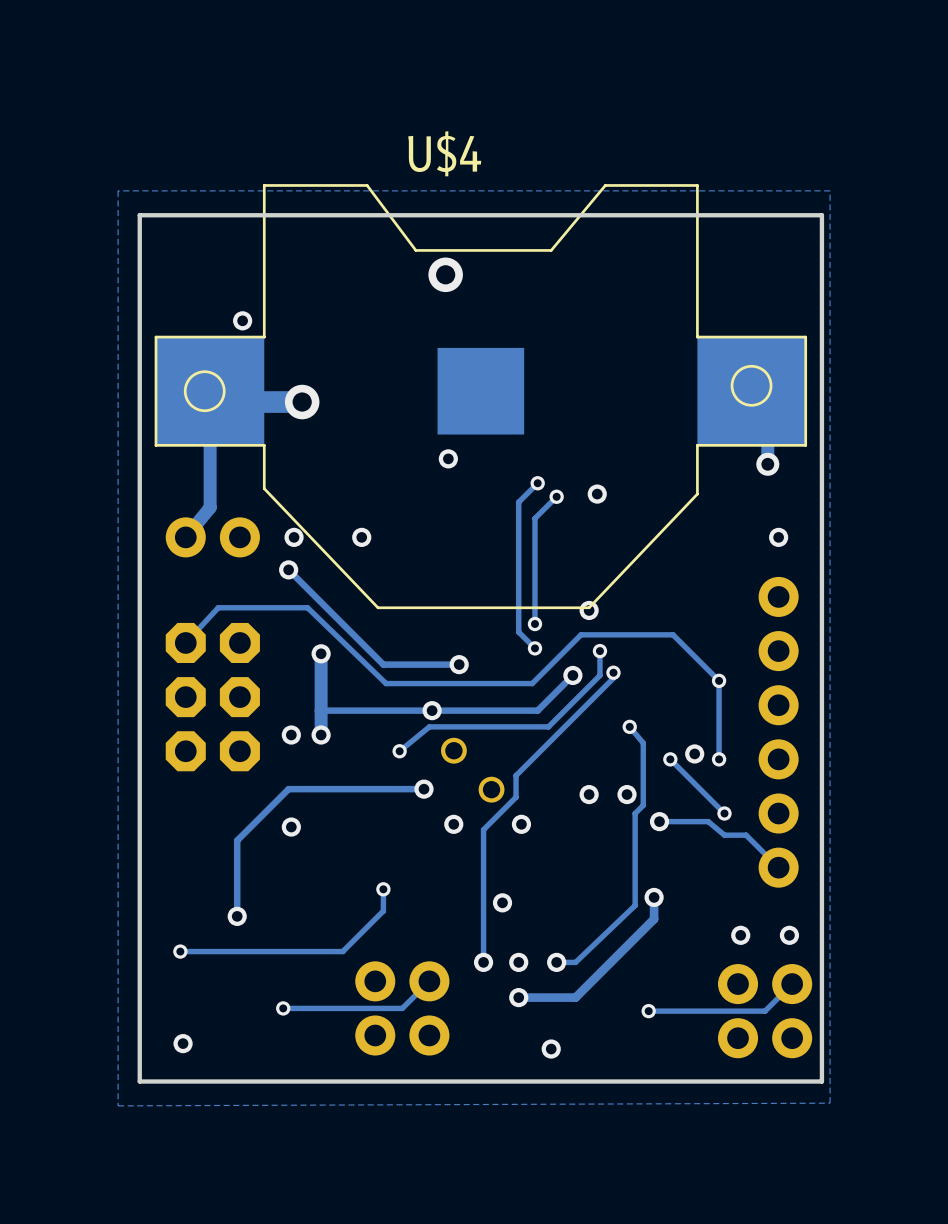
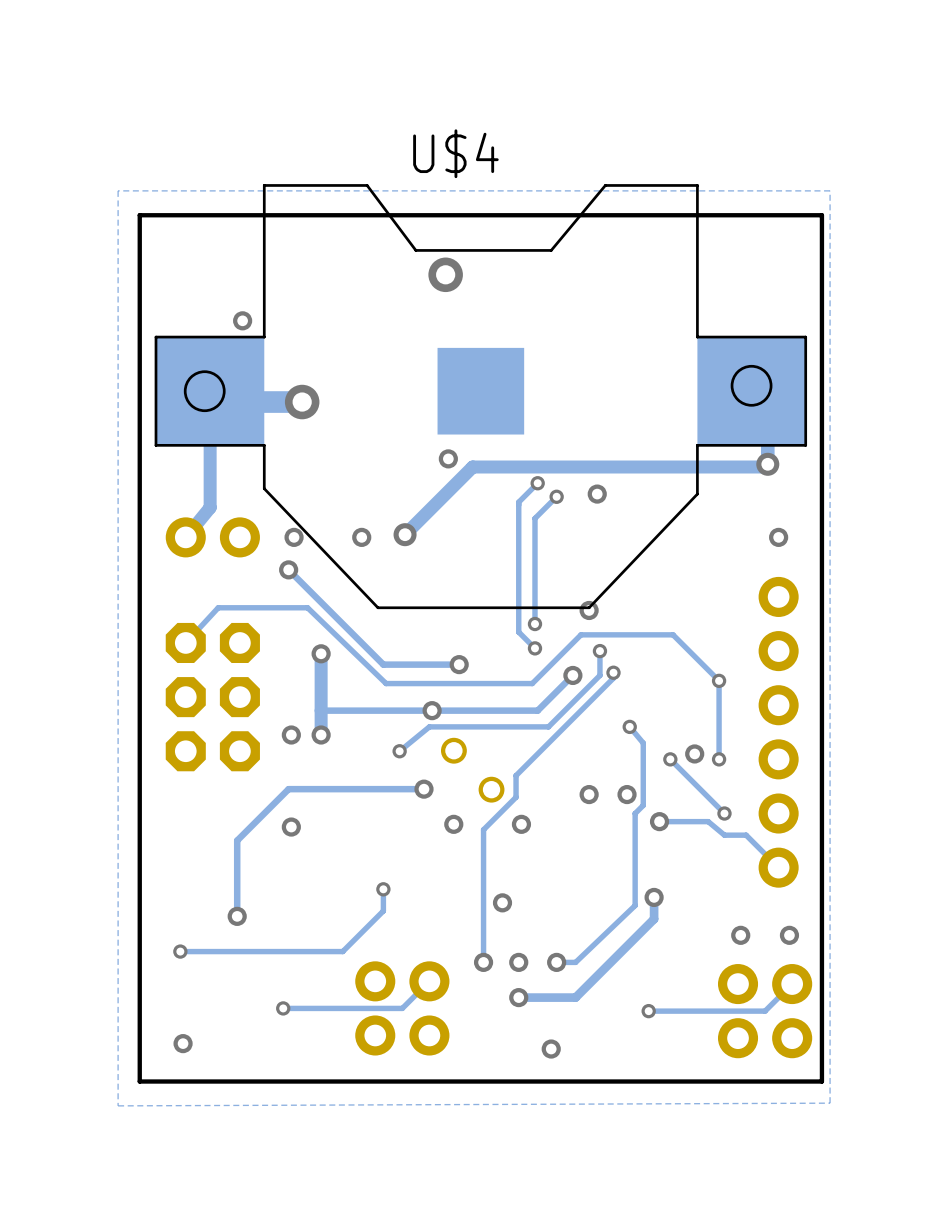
track: none -> (767, 467) (472, 467) (405, 534)
via: none -> (405, 534)

